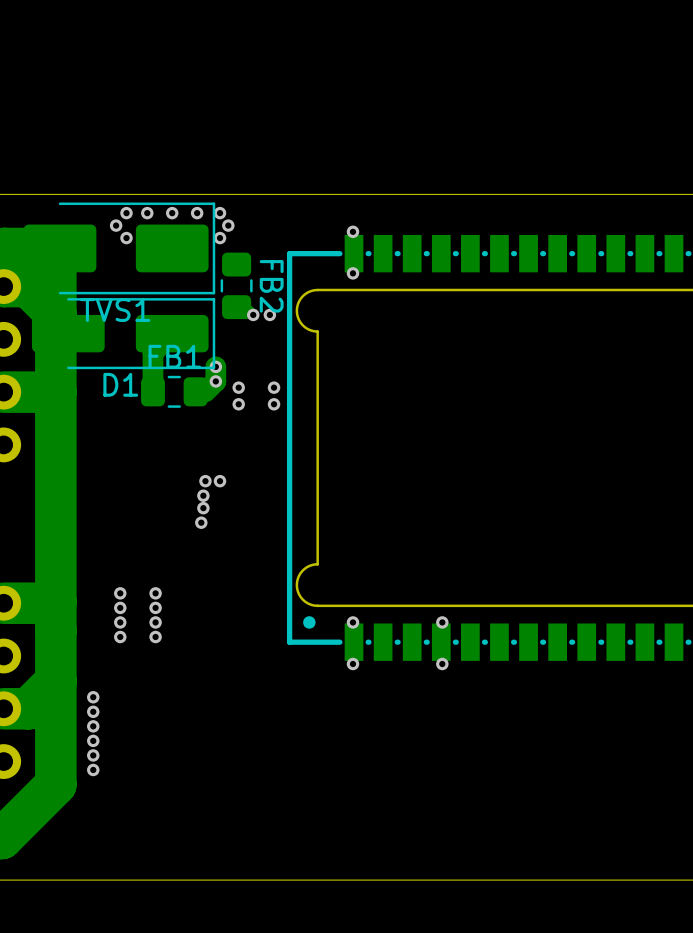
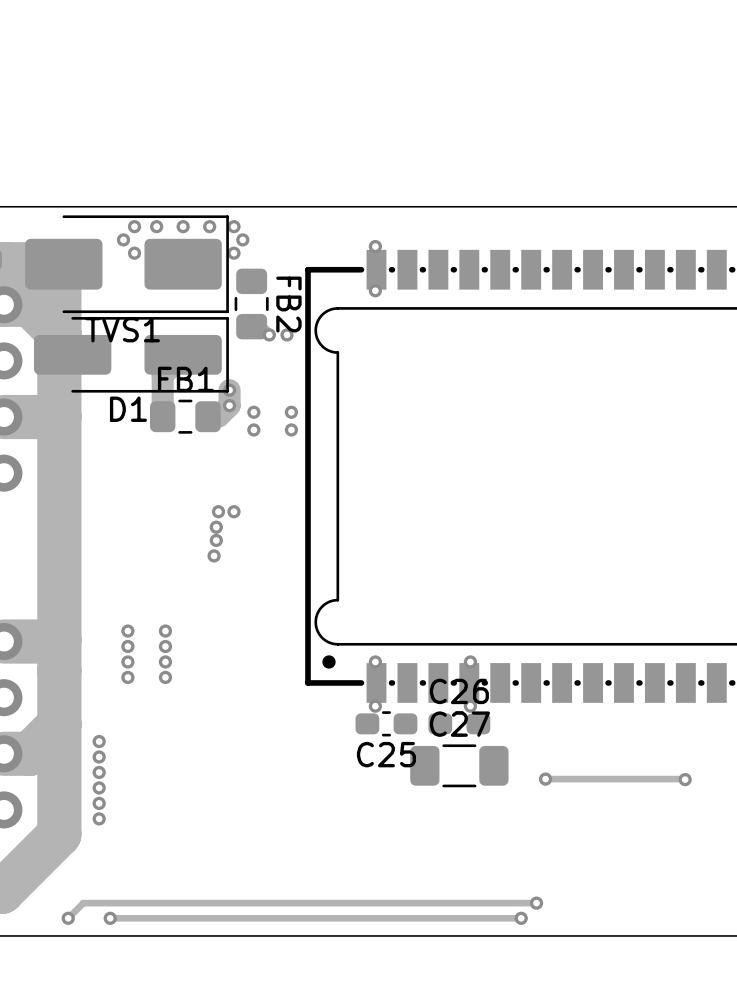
C25: none -> (386, 723)
C26: none -> (459, 723)
C27: none -> (459, 765)
track: none -> (545, 779) (685, 779)
via: none -> (545, 779)
via: none -> (685, 779)
track: none -> (536, 903) (83, 903) (68, 918)
via: none -> (536, 903)
via: none -> (68, 918)
via: none -> (110, 918)
track: none -> (521, 918) (110, 918)
via: none -> (521, 918)

